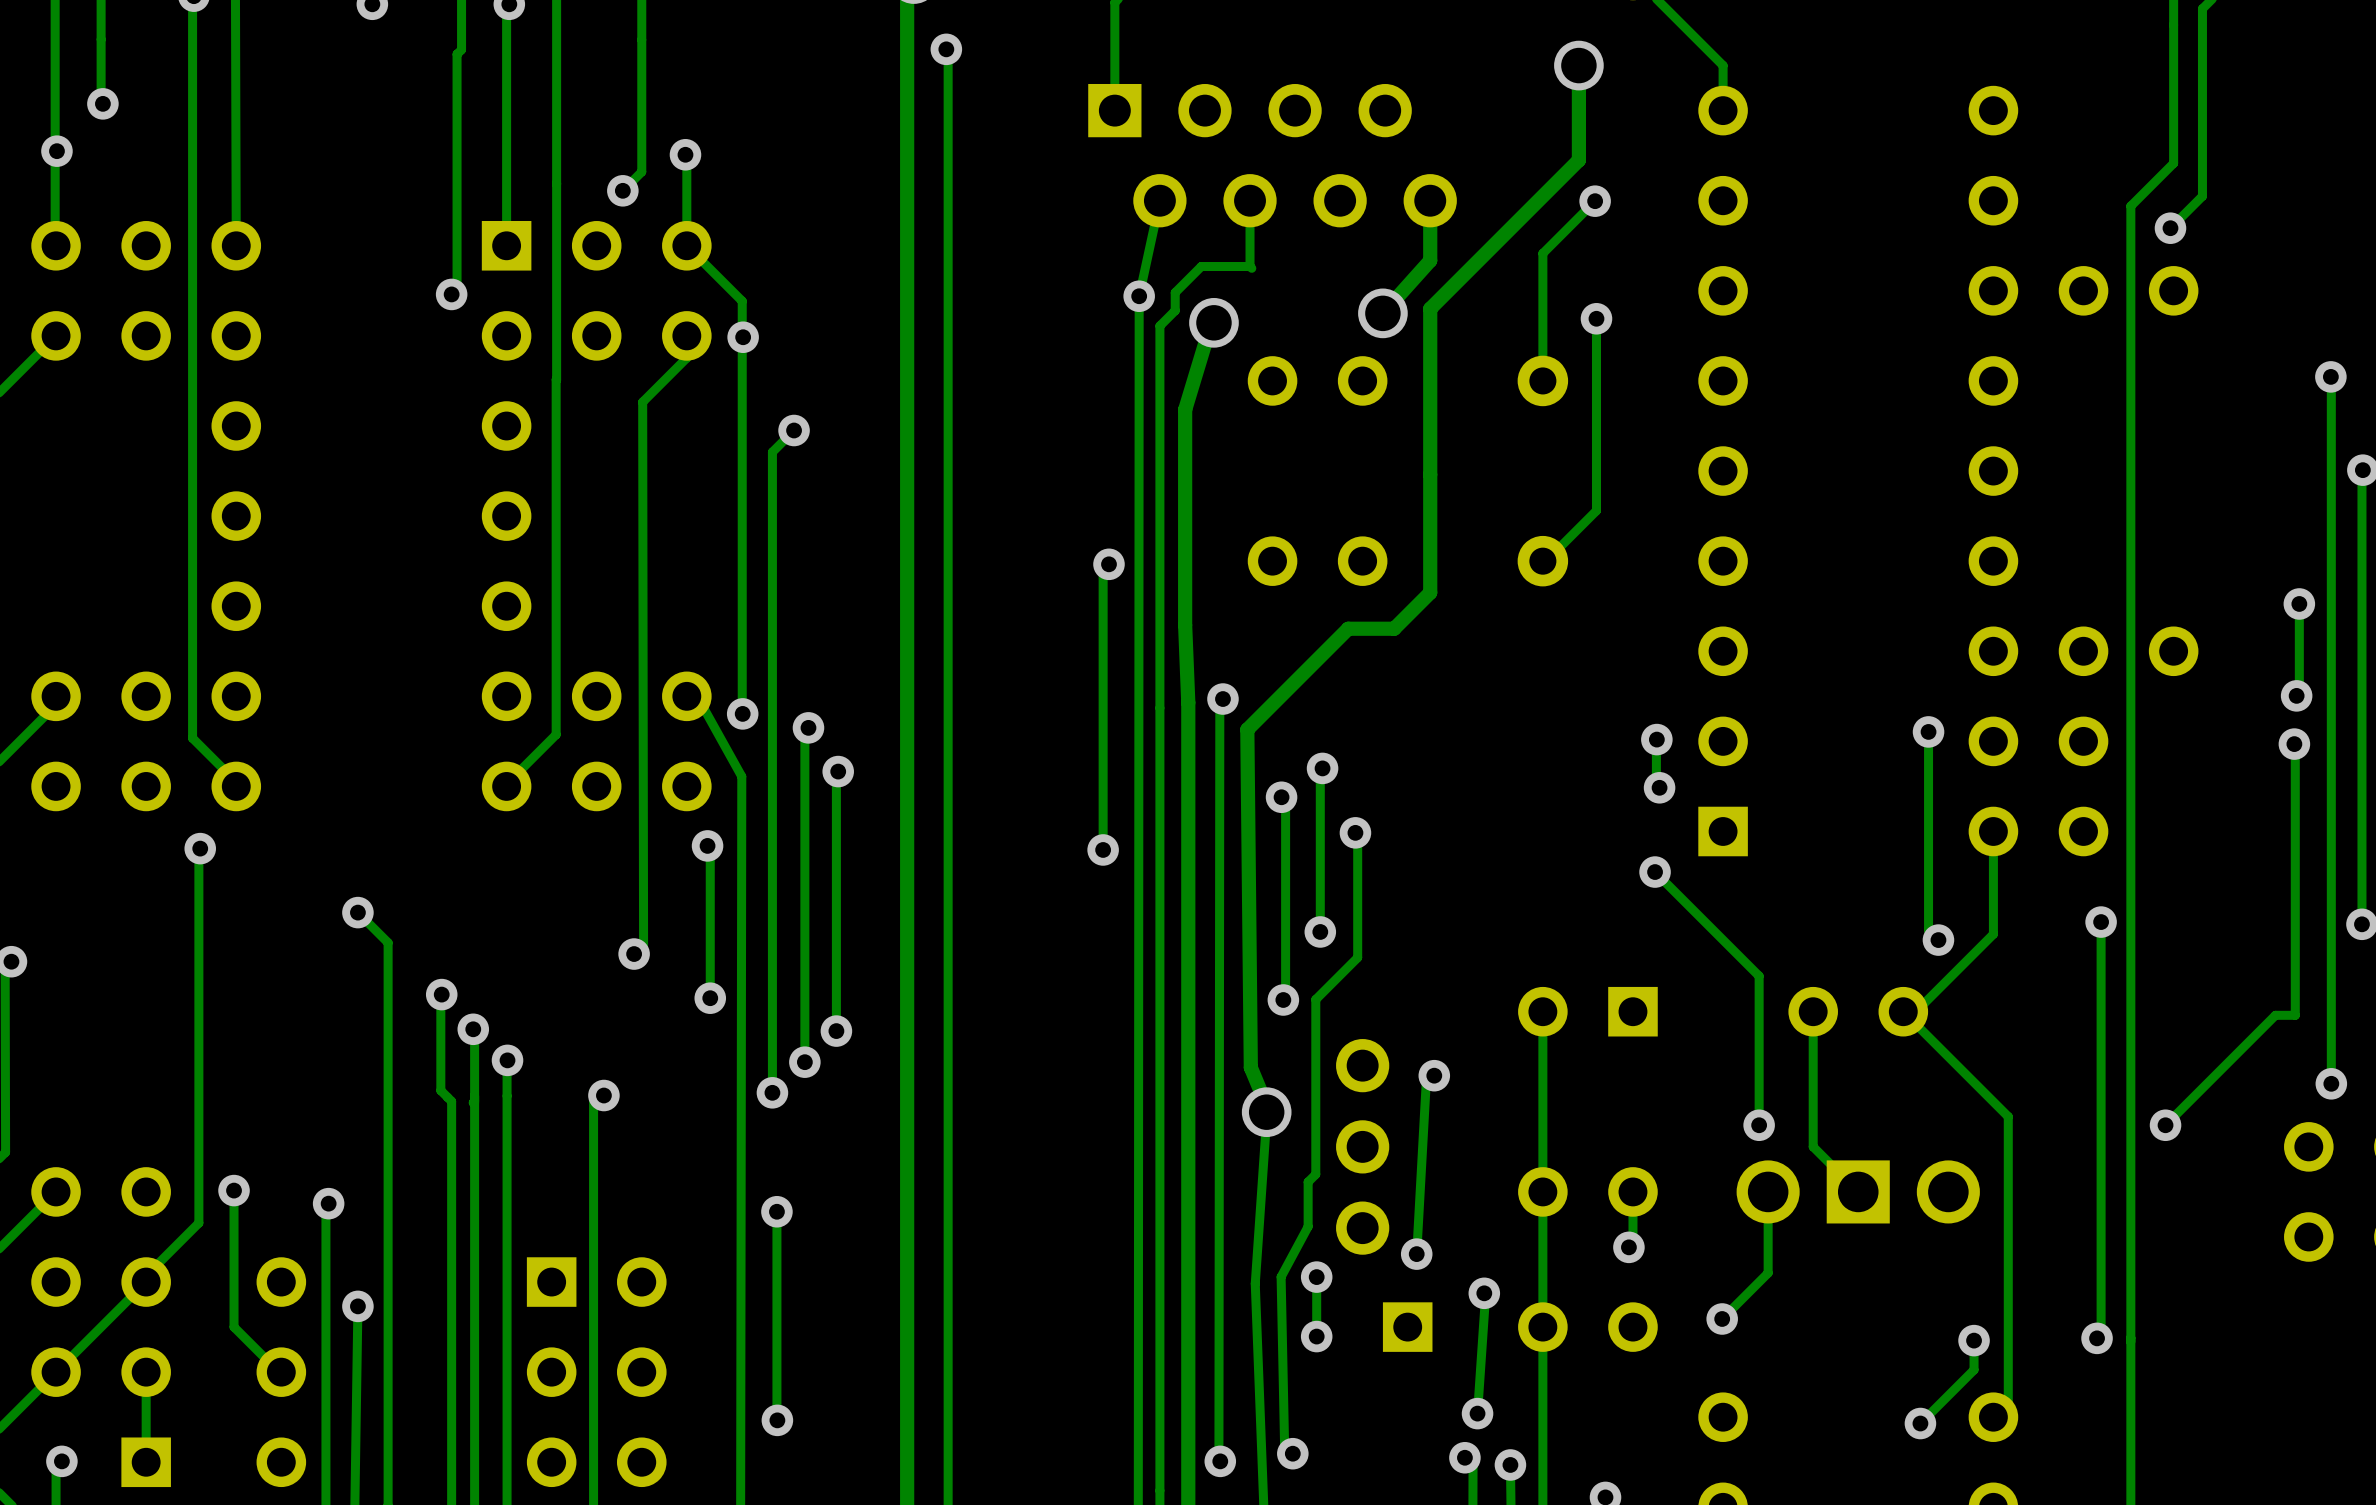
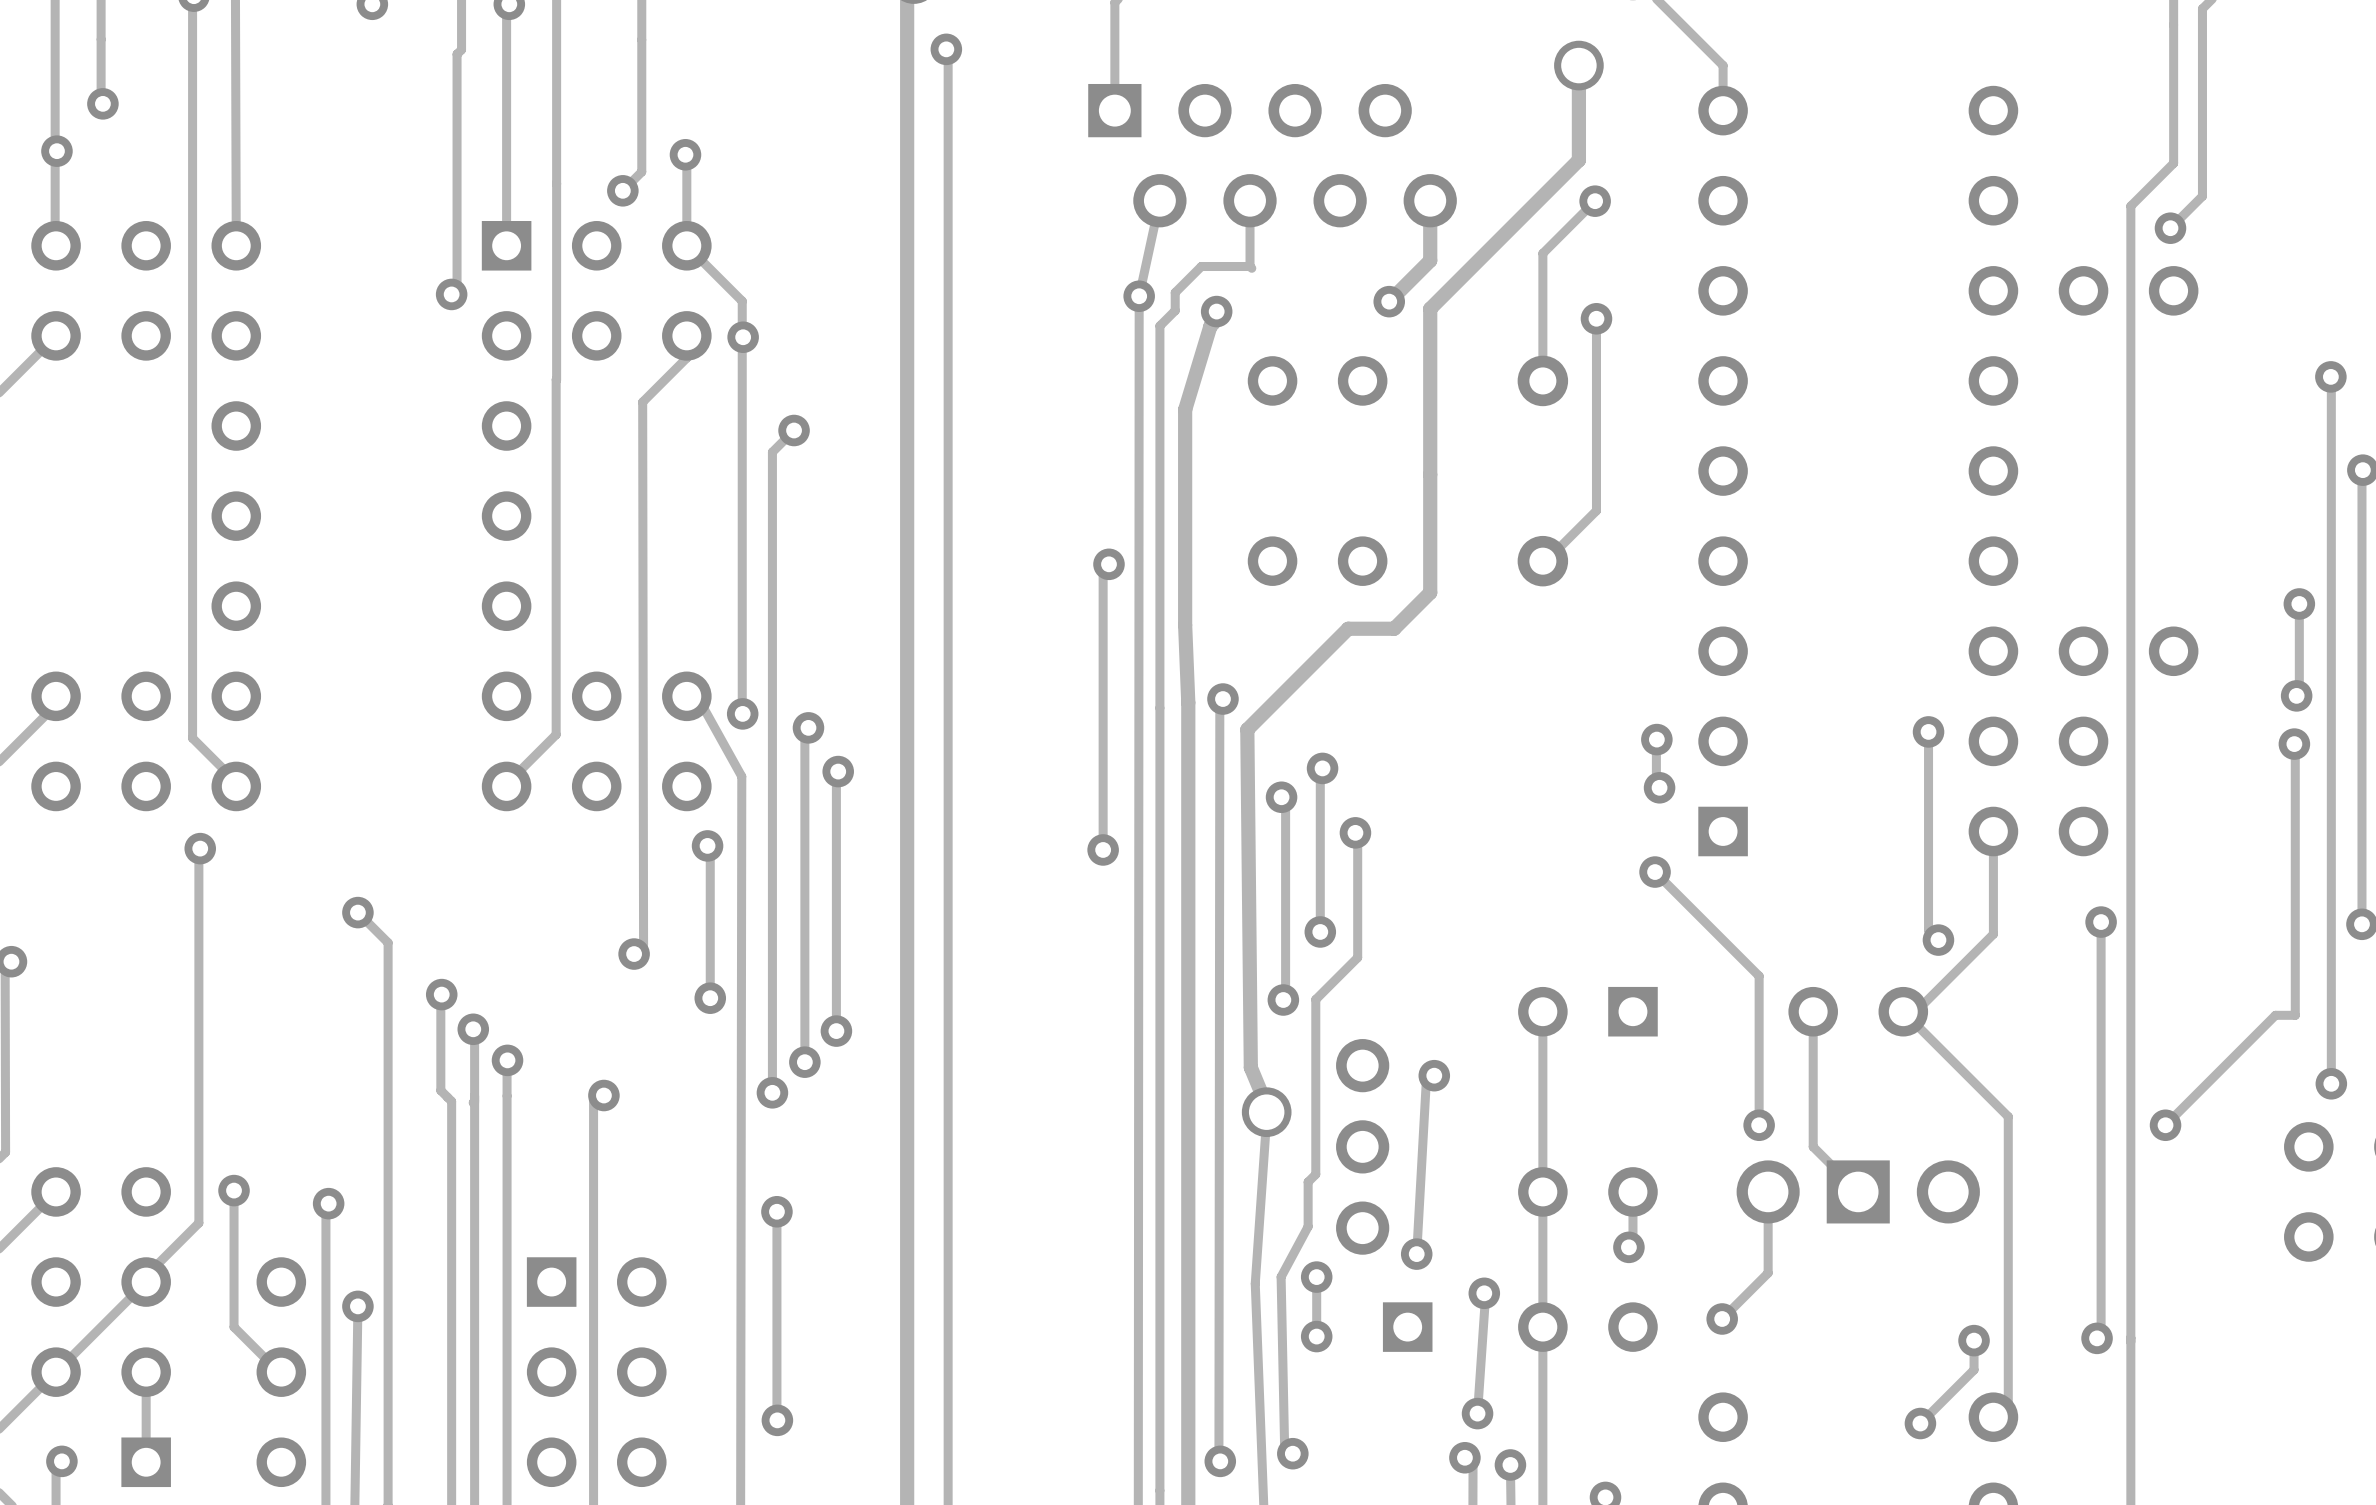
track: (1430, 260) (1382, 313) -> (1430, 260) (1389, 301)
via size: [1358, 288, 1408, 339] -> [1373, 285, 1406, 318]
via size: [1189, 297, 1239, 348] -> [1200, 295, 1233, 328]

